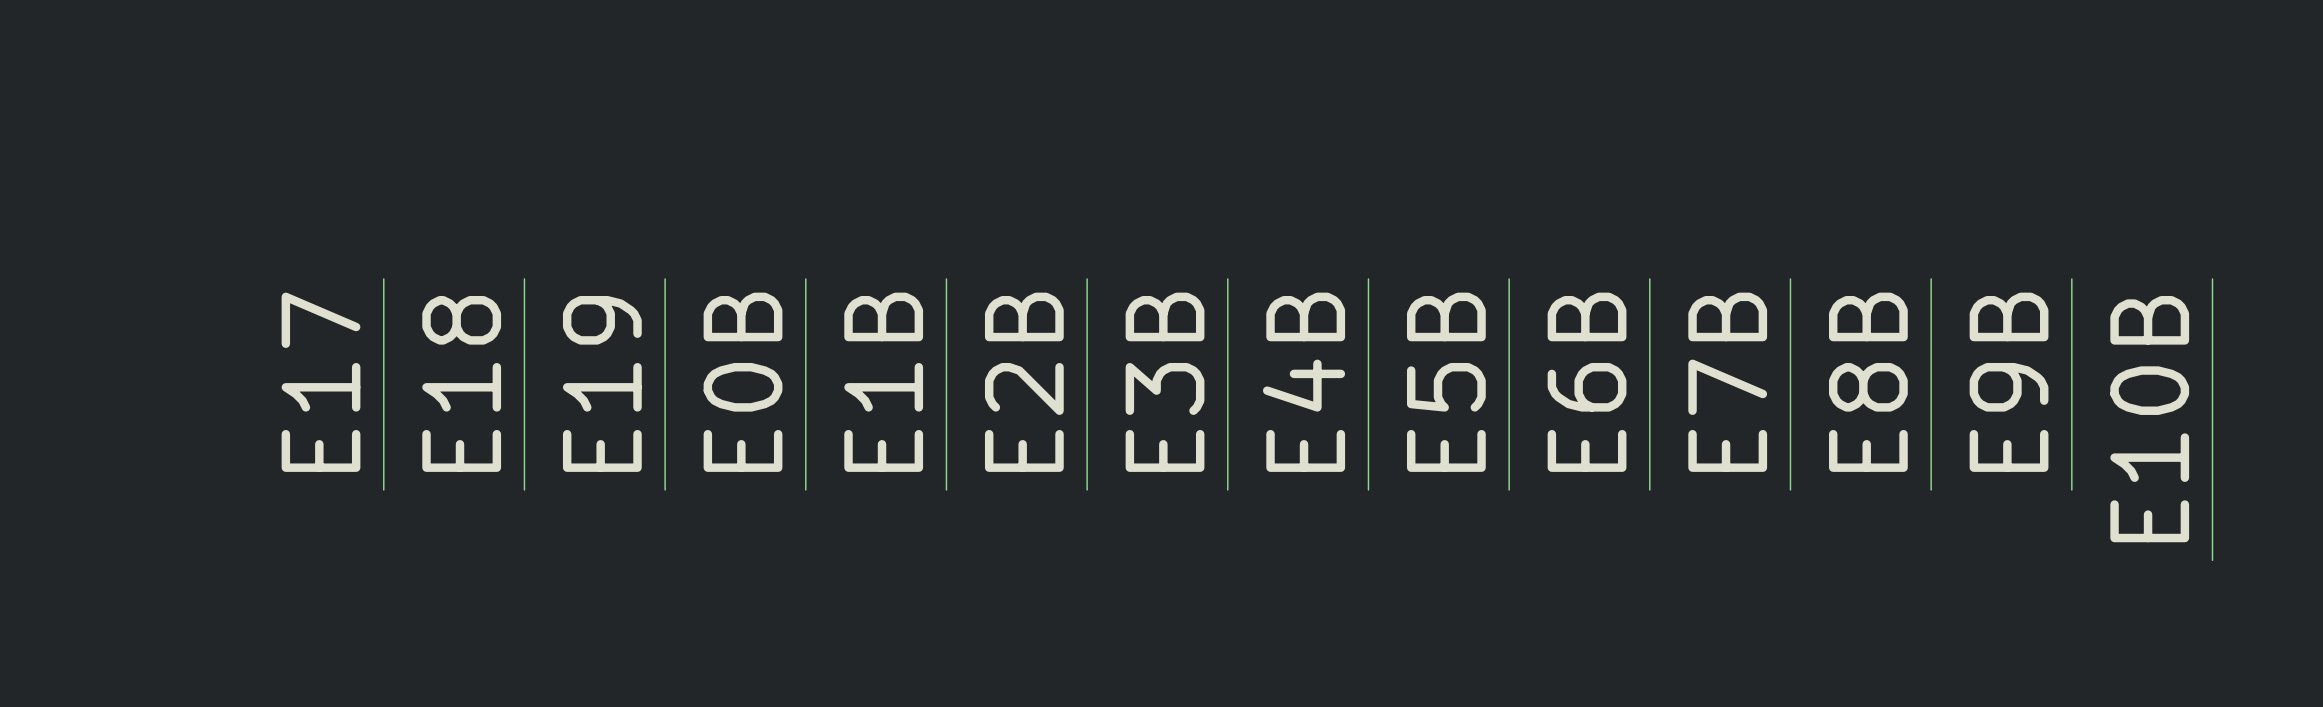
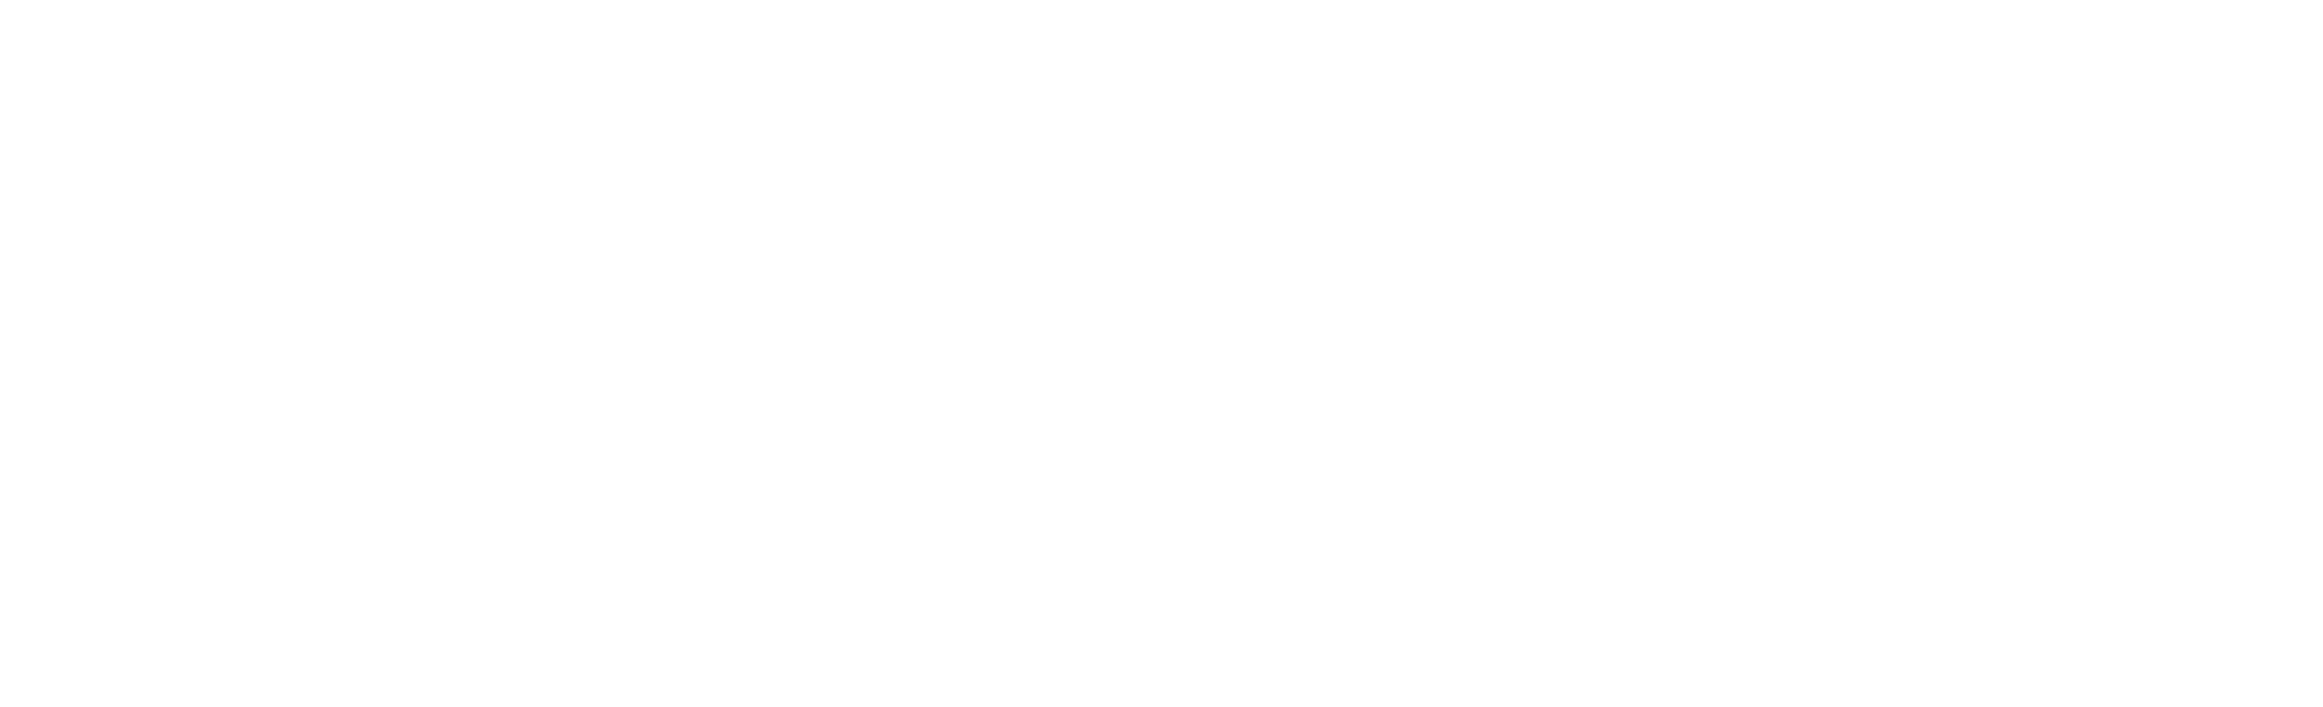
wire: (383, 278) (383, 489) -> none
wire: (524, 278) (524, 489) -> none
wire: (665, 278) (665, 489) -> none
wire: (805, 278) (805, 489) -> none
wire: (946, 278) (946, 489) -> none
wire: (1087, 278) (1087, 489) -> none
wire: (1227, 278) (1227, 489) -> none
wire: (1368, 278) (1368, 489) -> none
wire: (1509, 278) (1509, 489) -> none
wire: (1649, 278) (1649, 489) -> none
wire: (1790, 278) (1790, 489) -> none
wire: (1931, 278) (1931, 489) -> none
wire: (2071, 278) (2071, 489) -> none
wire: (2212, 278) (2212, 560) -> none
label: E17 (321, 382) -> none
label: E0B (743, 382) -> none
label: E1B (883, 382) -> none
label: E2B (1024, 382) -> none
label: E3B (1165, 382) -> none
label: E4B (1304, 382) -> none
label: E5B (1446, 382) -> none
label: E6B (1587, 382) -> none
label: E7B (1727, 382) -> none
label: E8B (1868, 382) -> none
label: E9B (2009, 382) -> none
label: E18 (461, 383) -> none
label: E19 (602, 383) -> none
label: E10B (2149, 419) -> none

